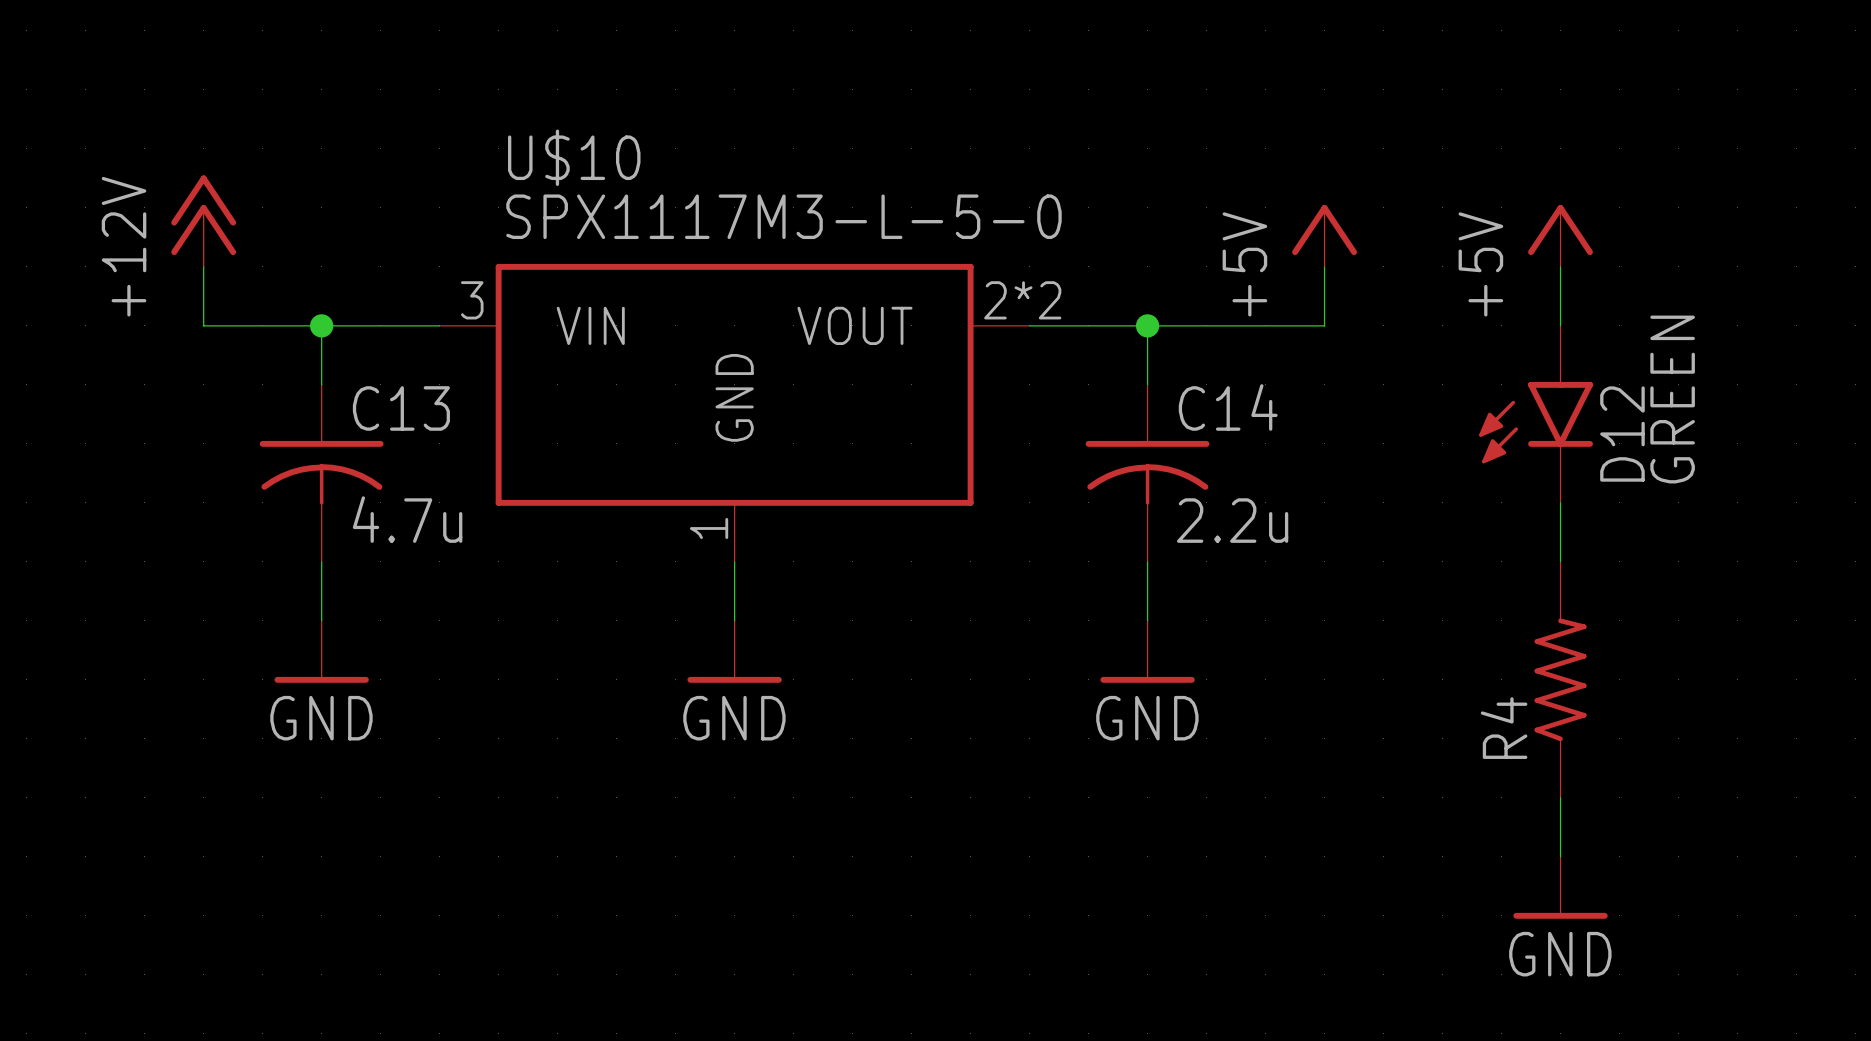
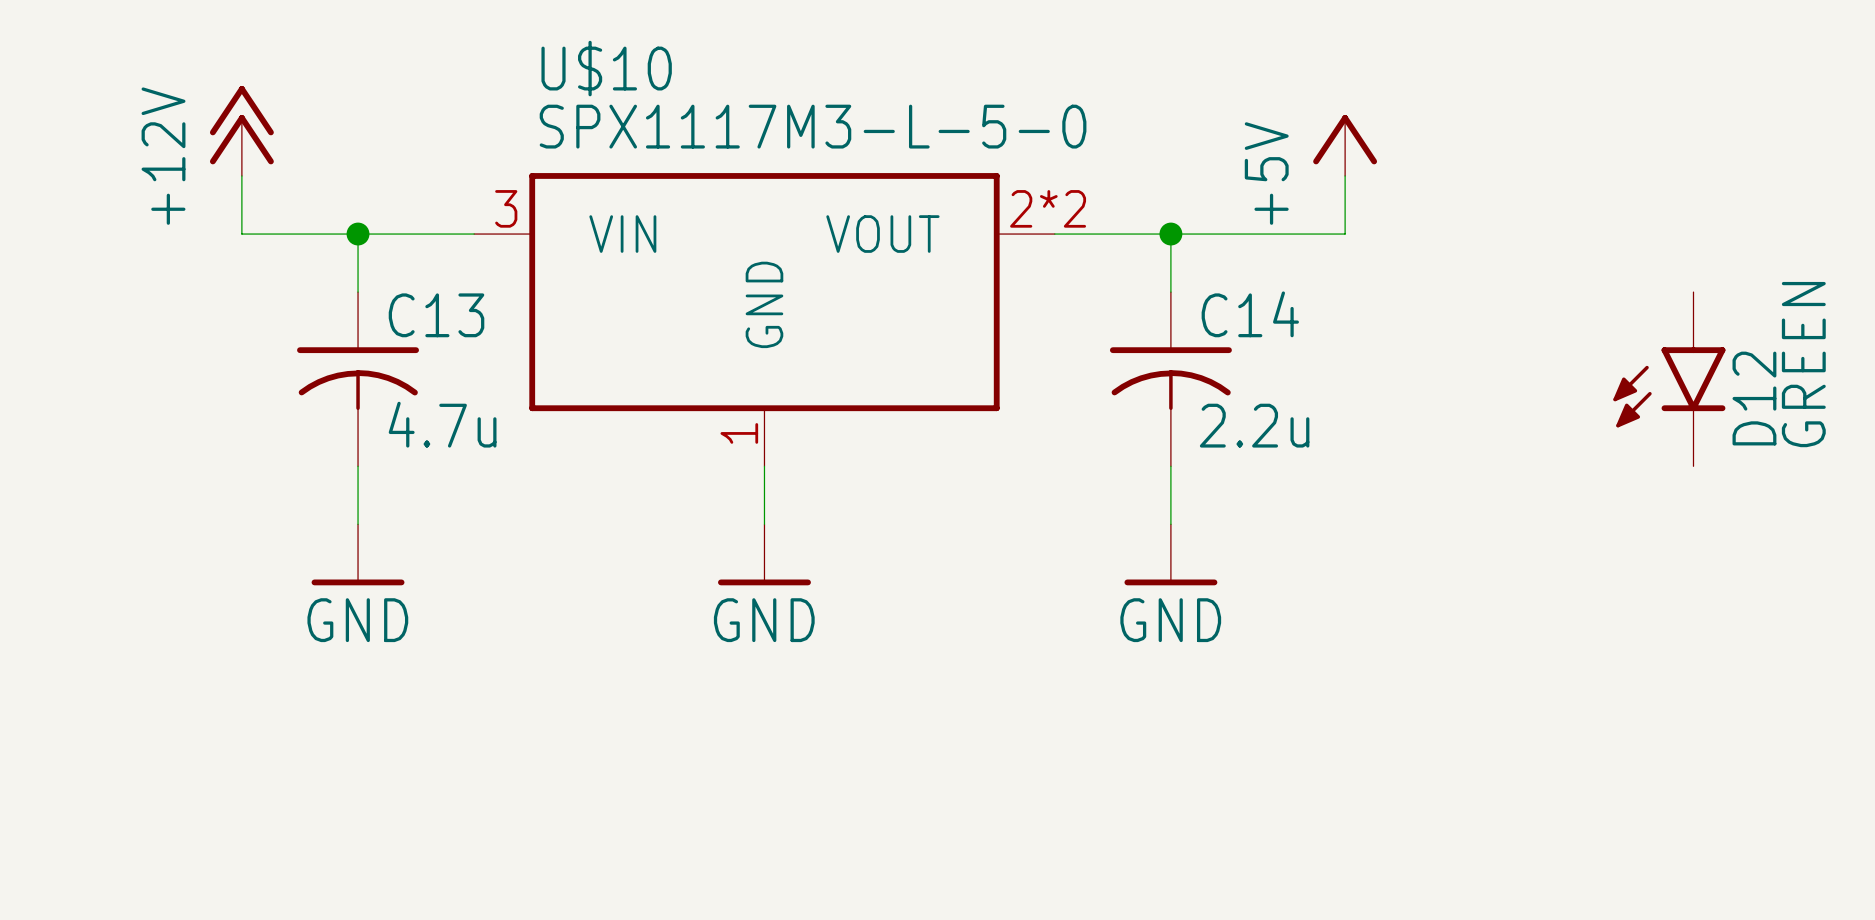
power symbol: +5V (1560, 235) -> none
wire: (1560, 266) (1560, 325) -> none
D12 position: (1536, 414) -> (1669, 379)
wire: (1560, 502) (1560, 561) -> none
R4: (1560, 679) -> none
wire: (1560, 797) (1560, 856) -> none
power symbol: GND (1560, 887) -> none

